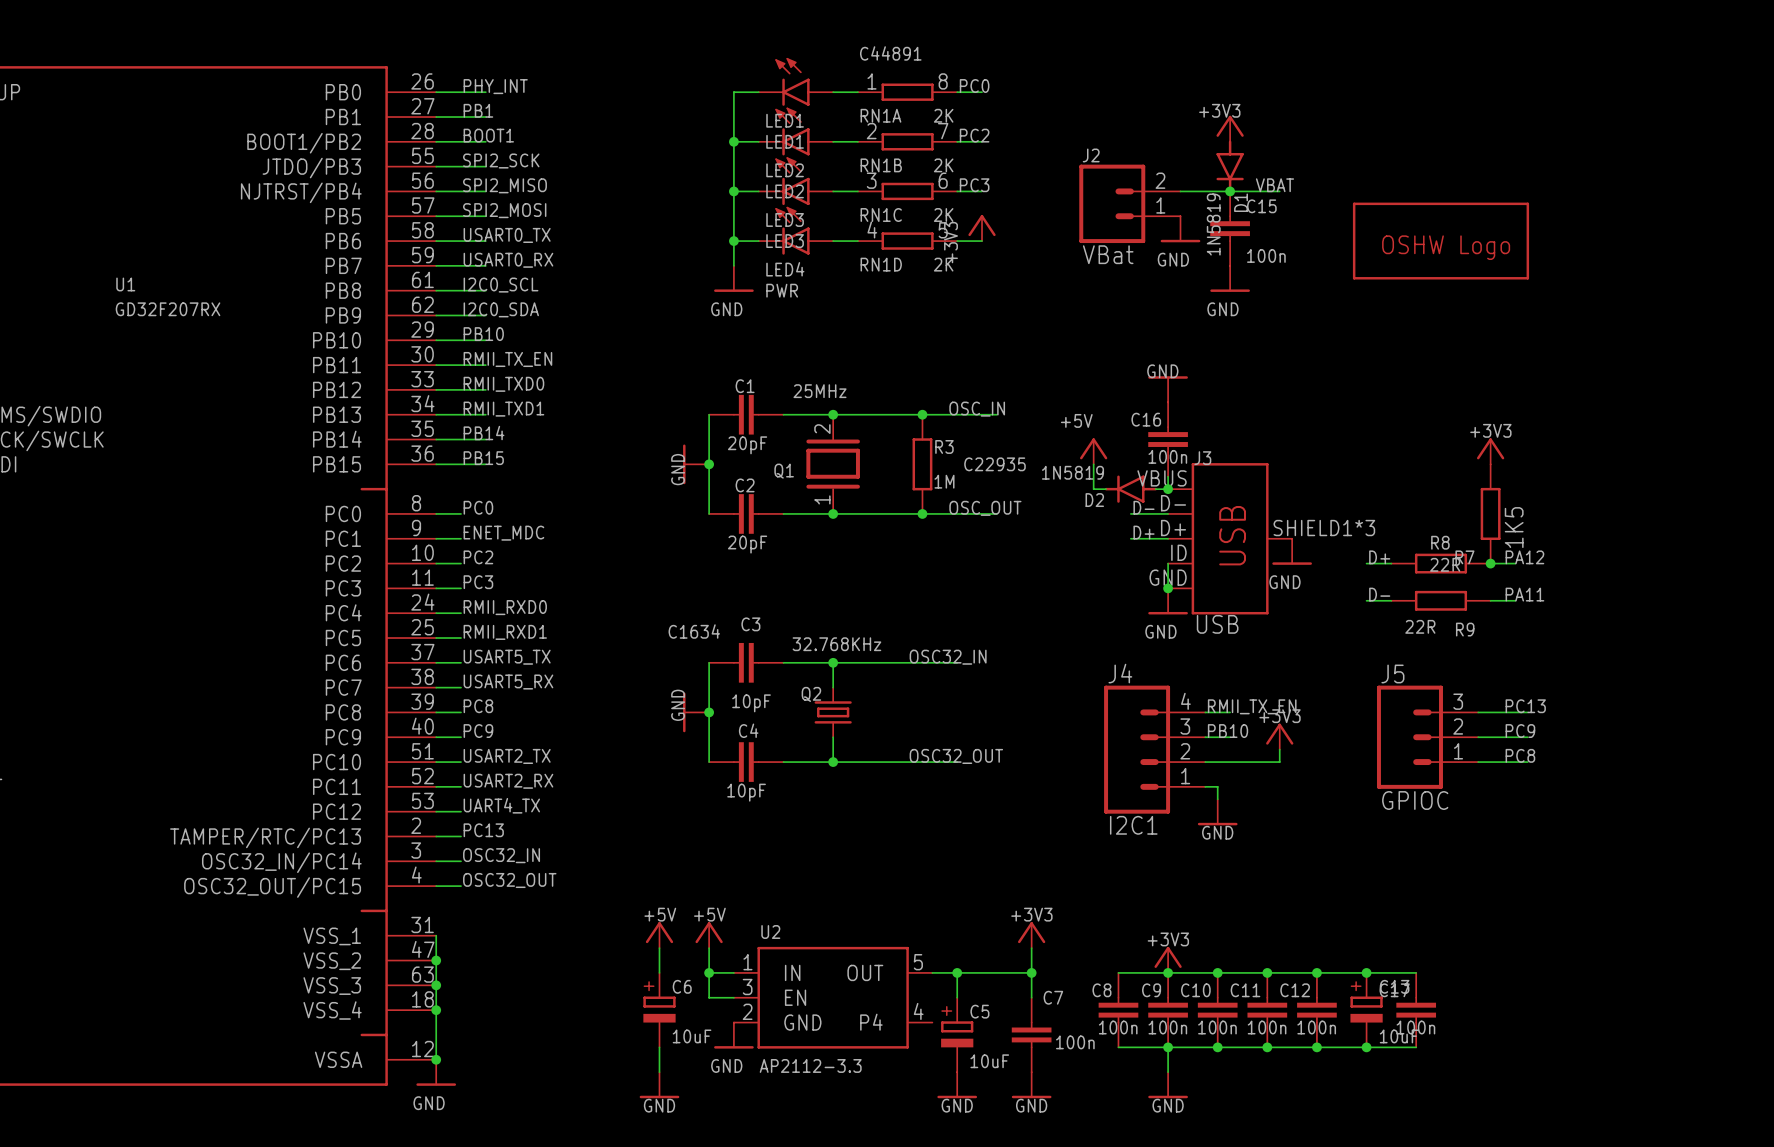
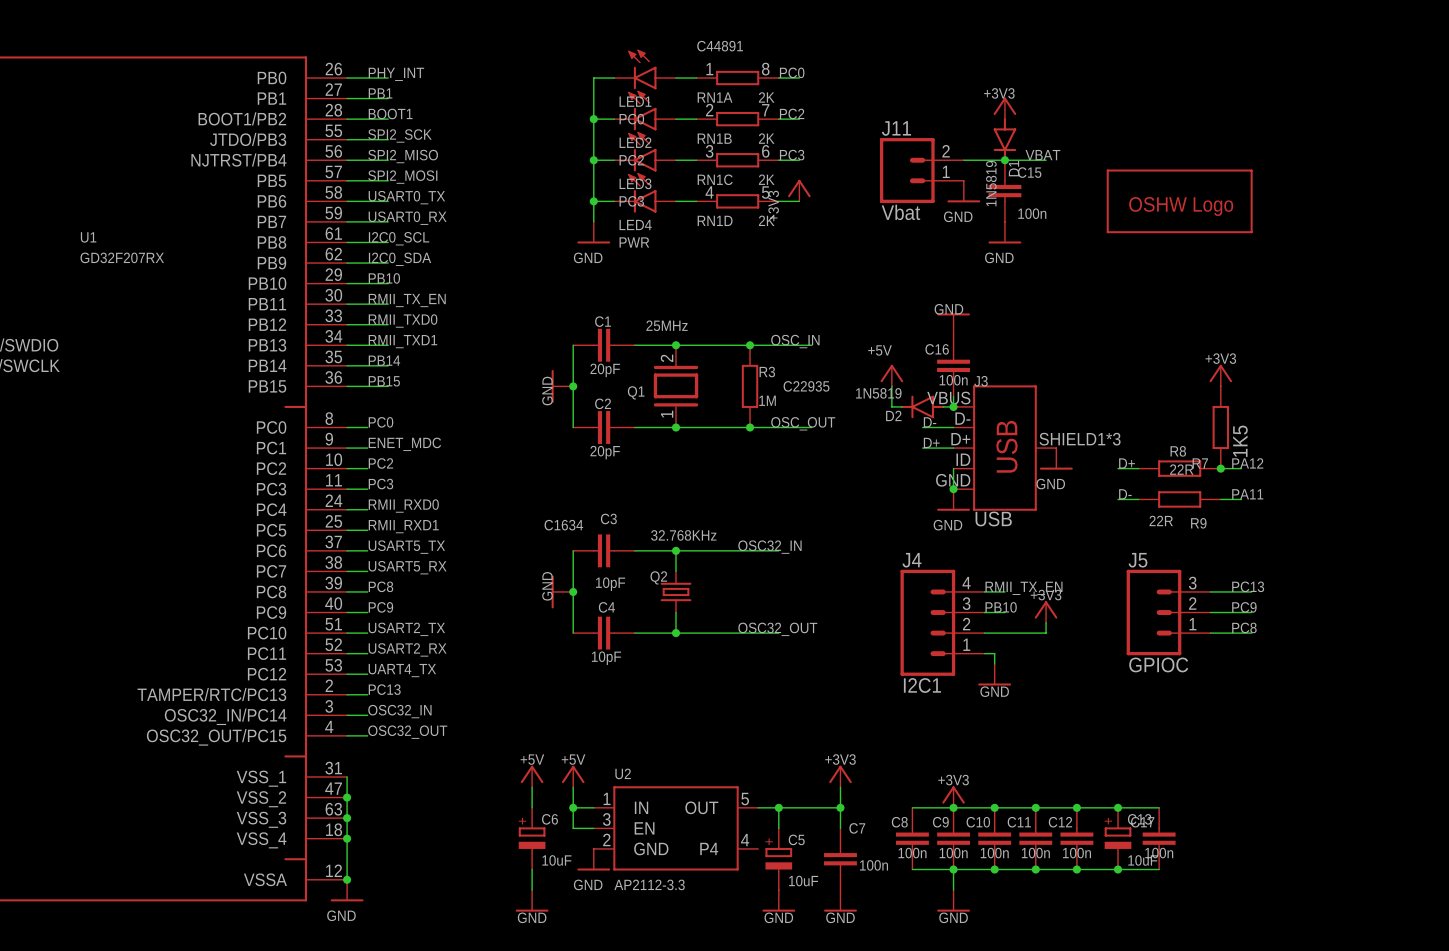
LED1 value: LED1 (785, 141) -> PC0 (631, 119)
J2 name: J2 (1091, 155) -> J11 (896, 128)
LED2 value: LED2 (785, 191) -> PC2 (631, 160)
LED3 value: LED3 (785, 241) -> PC3 (631, 201)
J2 value: VBat (1108, 254) -> Vbat (900, 212)

